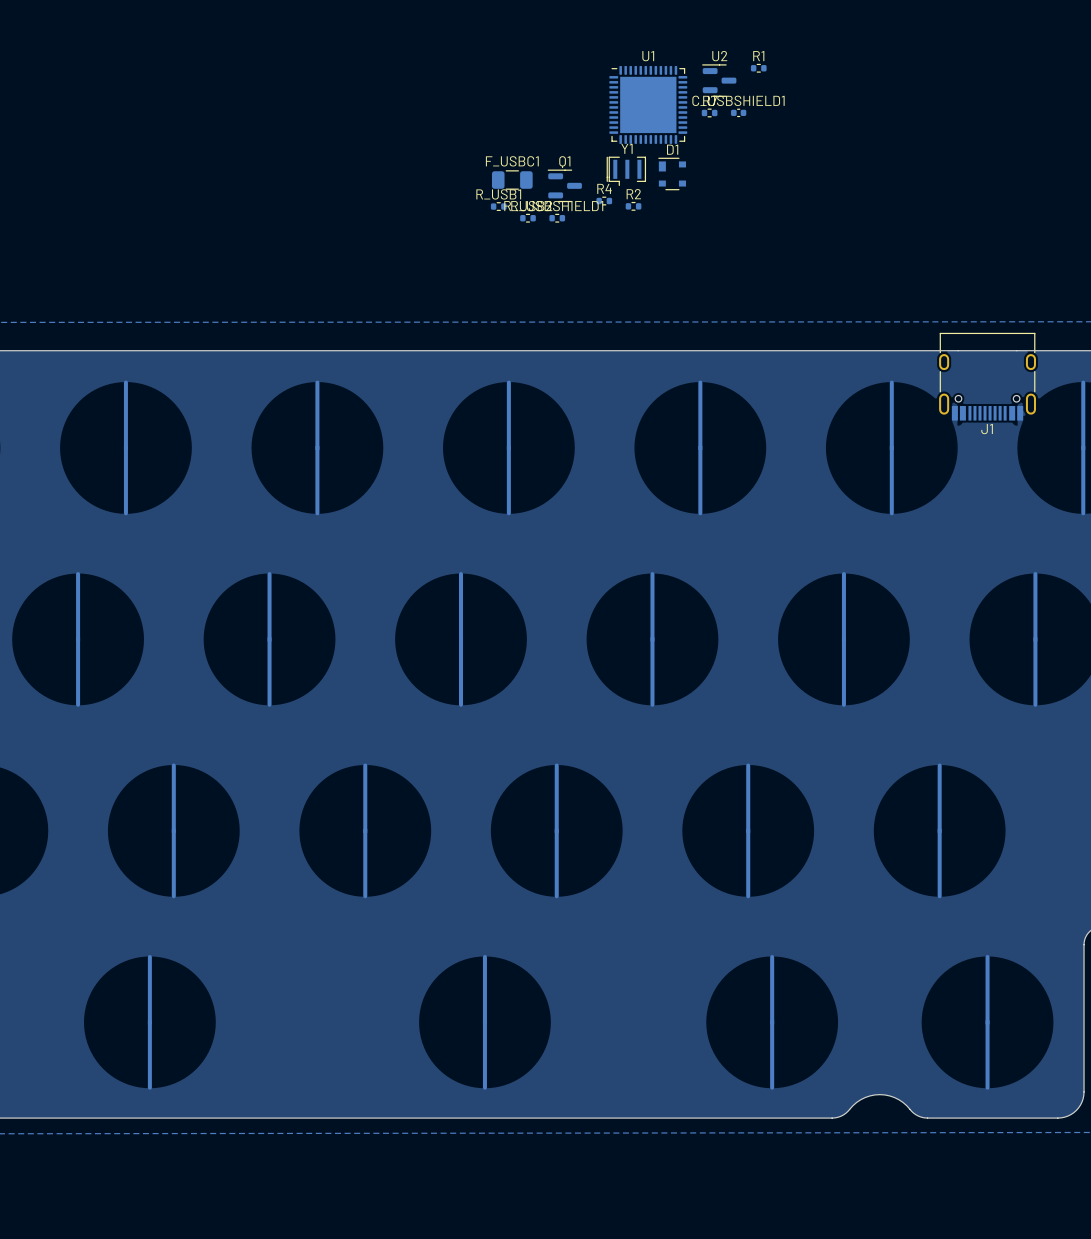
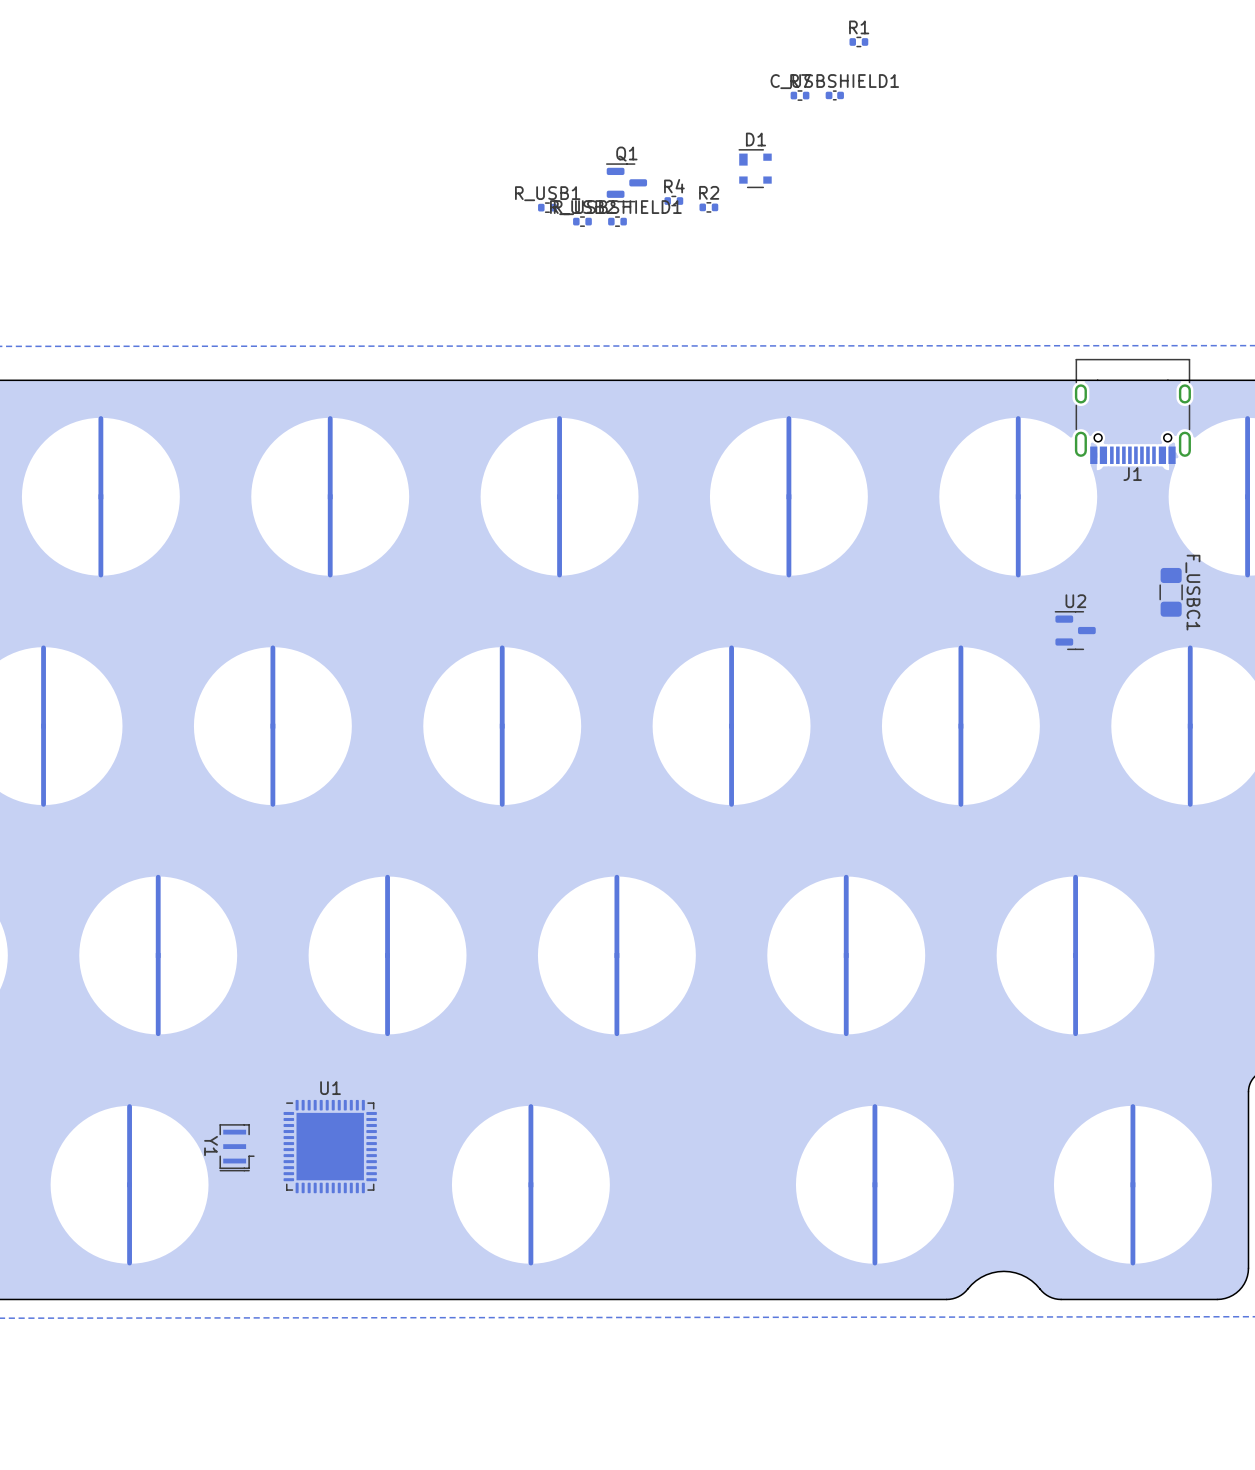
U2 position: (719, 80) -> (1075, 630)
U1 position: (648, 104) -> (330, 1146)
Y1 rotation: 0° (626, 171) -> 90° counterclockwise (237, 1147)
Y1 position: (626, 171) -> (237, 1147)
F_USBC1 rotation: 0° (512, 180) -> 90° clockwise (1171, 592)
F_USBC1 position: (512, 180) -> (1171, 592)

